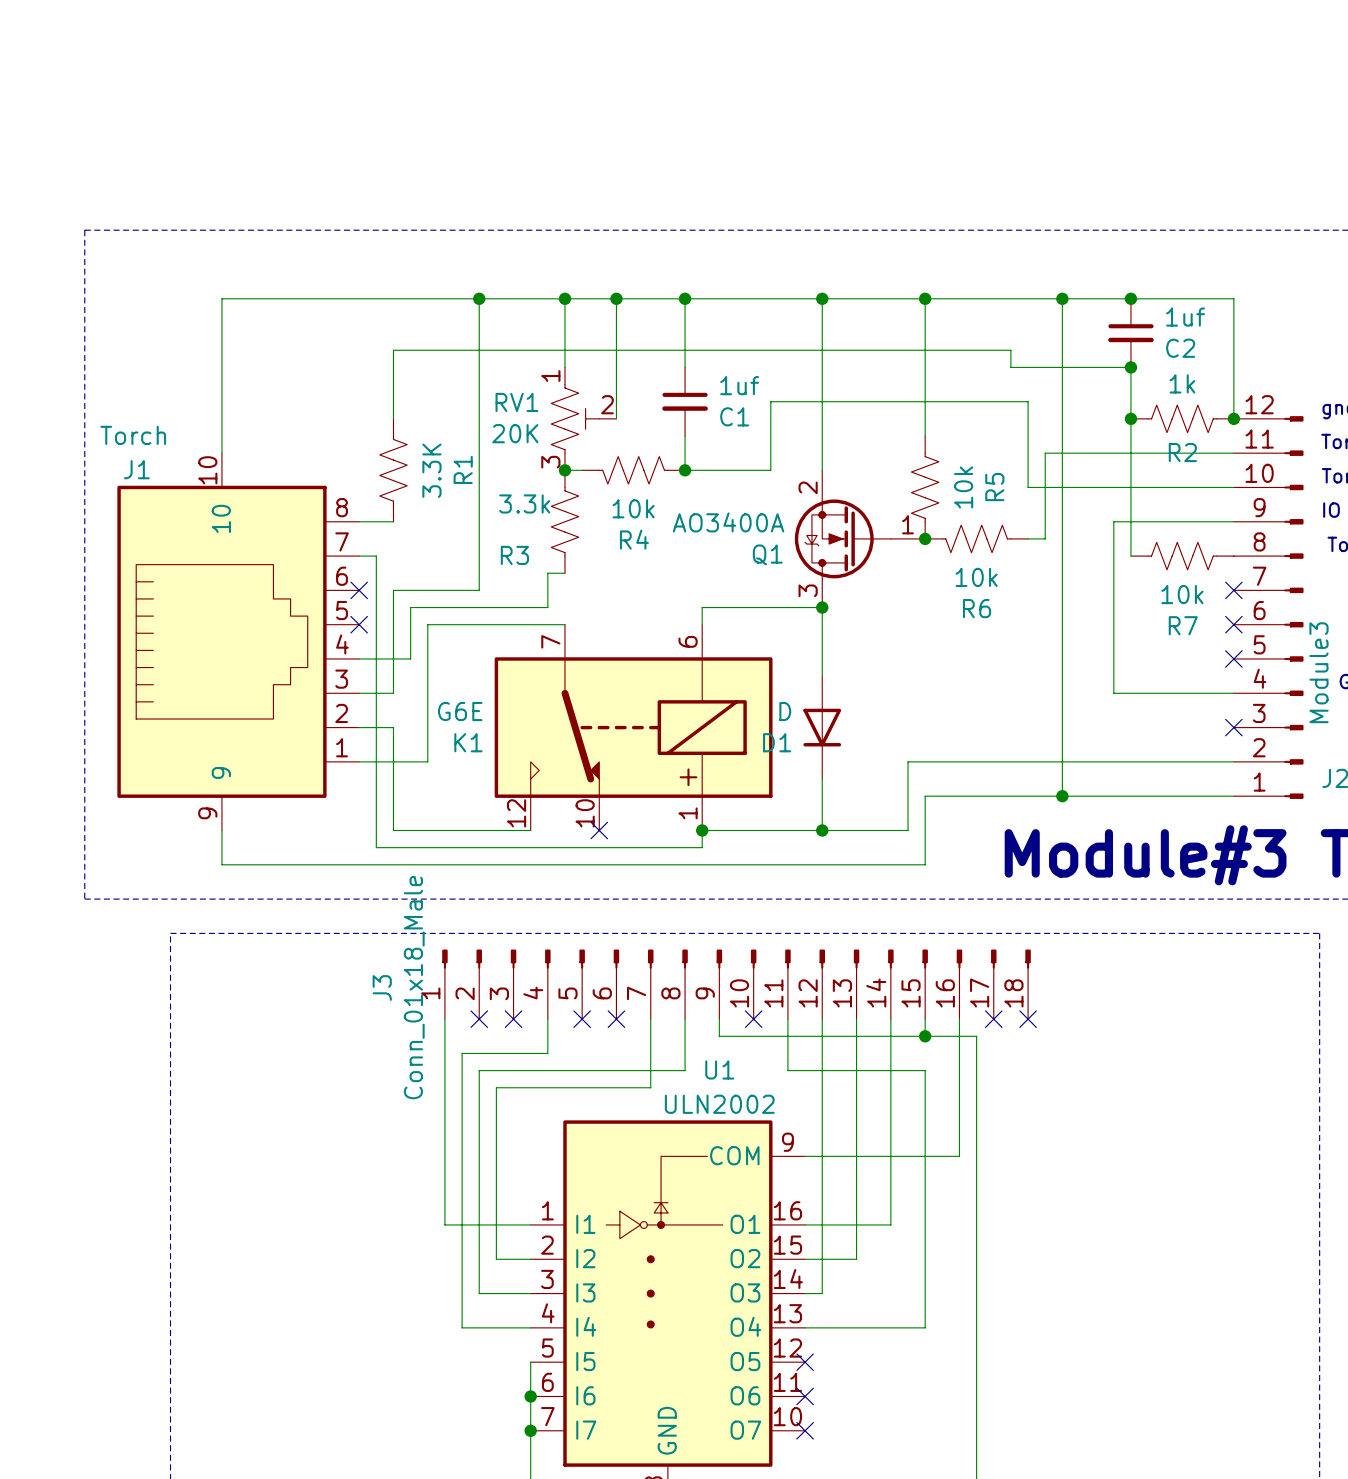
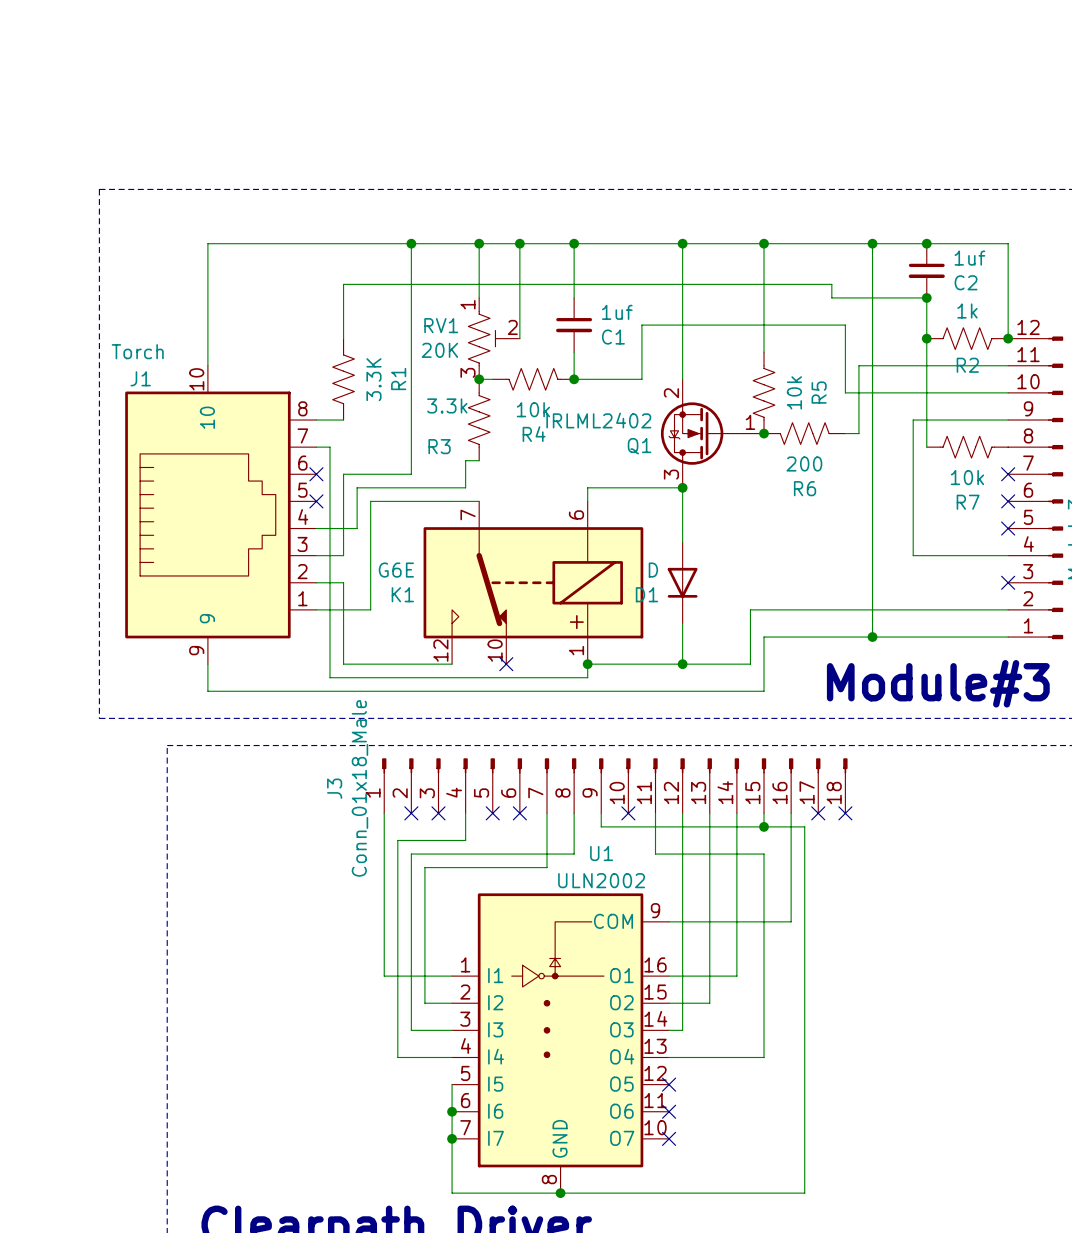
Q1 value: AO3400A (728, 522) -> IRLML2402 (598, 420)
R6 value: 10k (976, 577) -> 200 (804, 463)

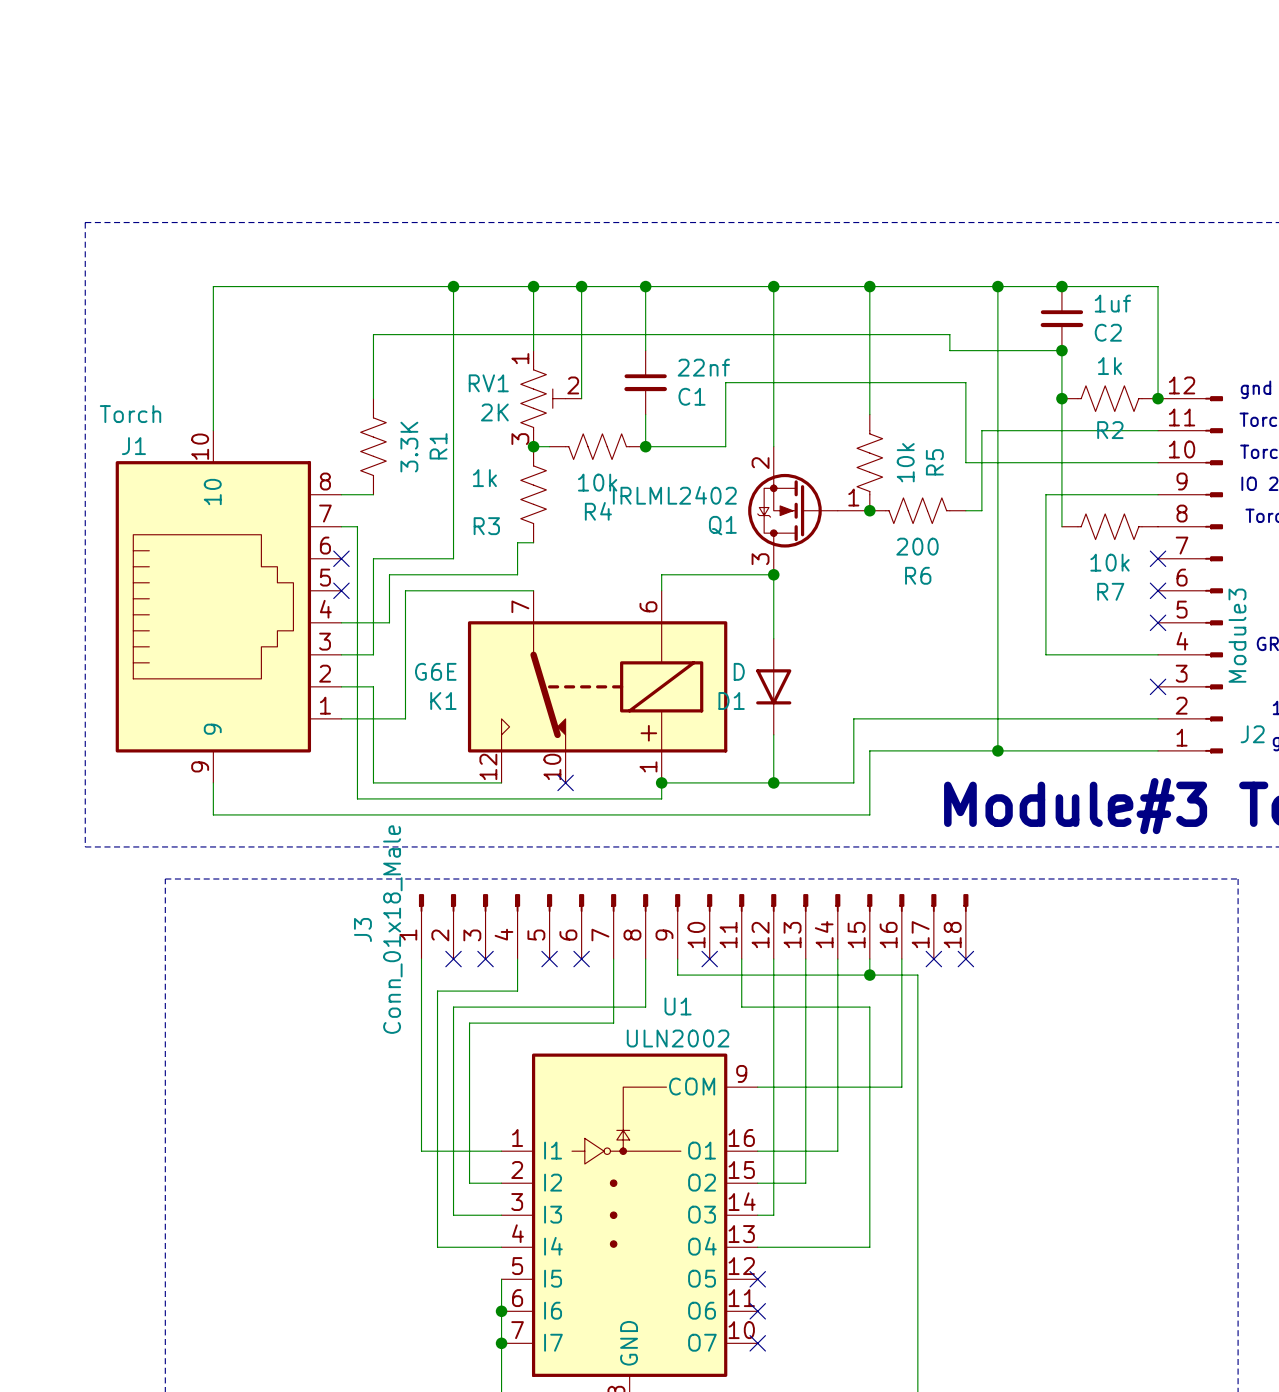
C1 value: 1uf (617, 312) -> 22nf (703, 367)
RV1 value: 20K (439, 350) -> 2K (494, 412)
R3 value: 3.3k (447, 405) -> 1k (484, 478)

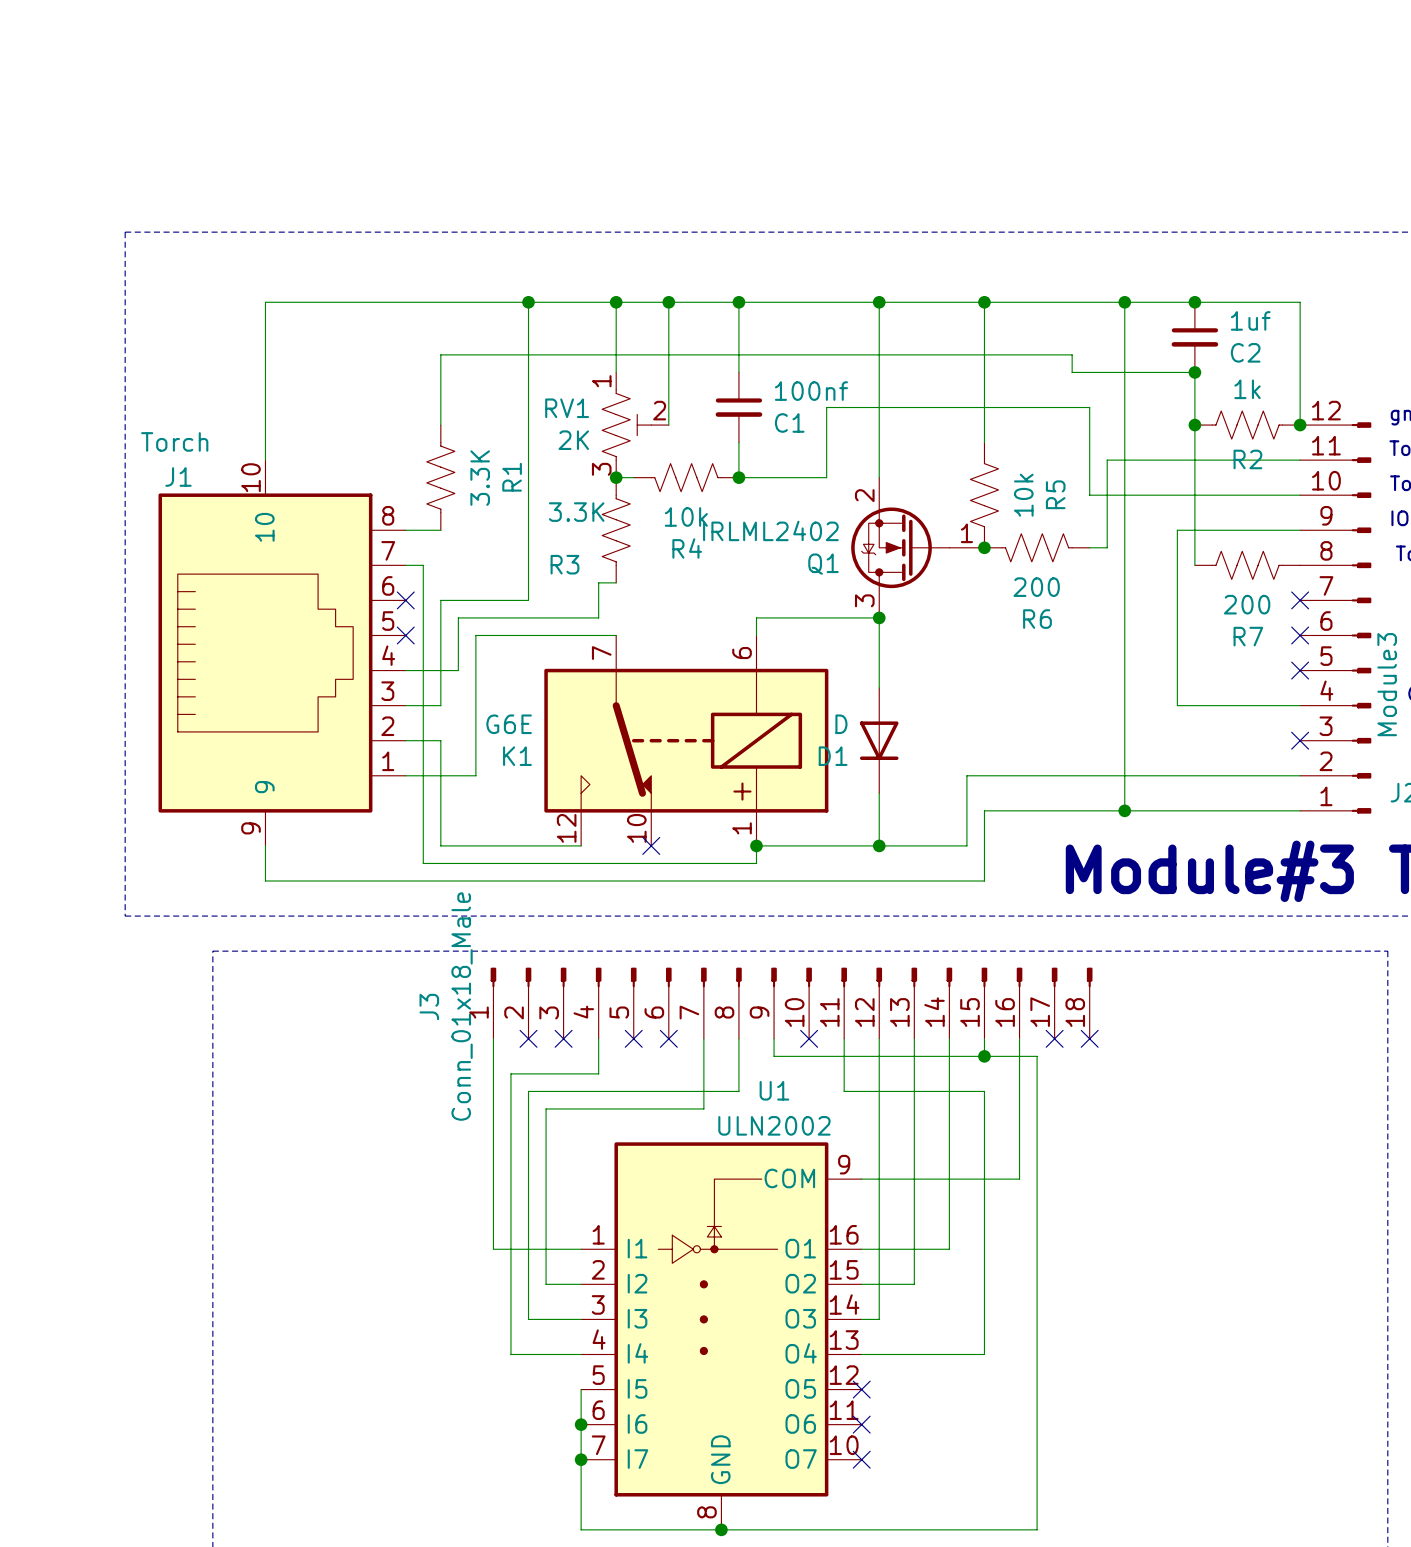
C1 value: 22nf (703, 367) -> 100nf (811, 391)
R3 value: 1k (484, 478) -> 3.3K (576, 512)
R7 value: 10k (1109, 562) -> 200 (1247, 604)

